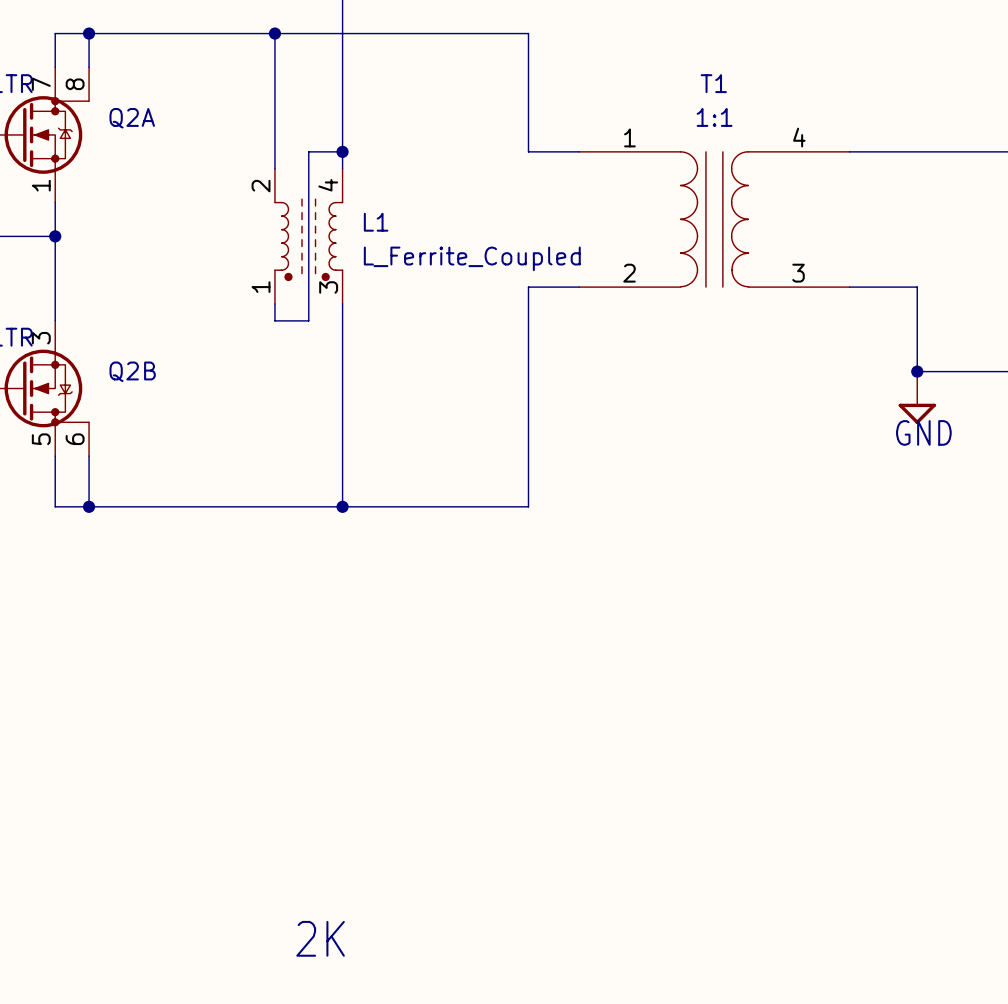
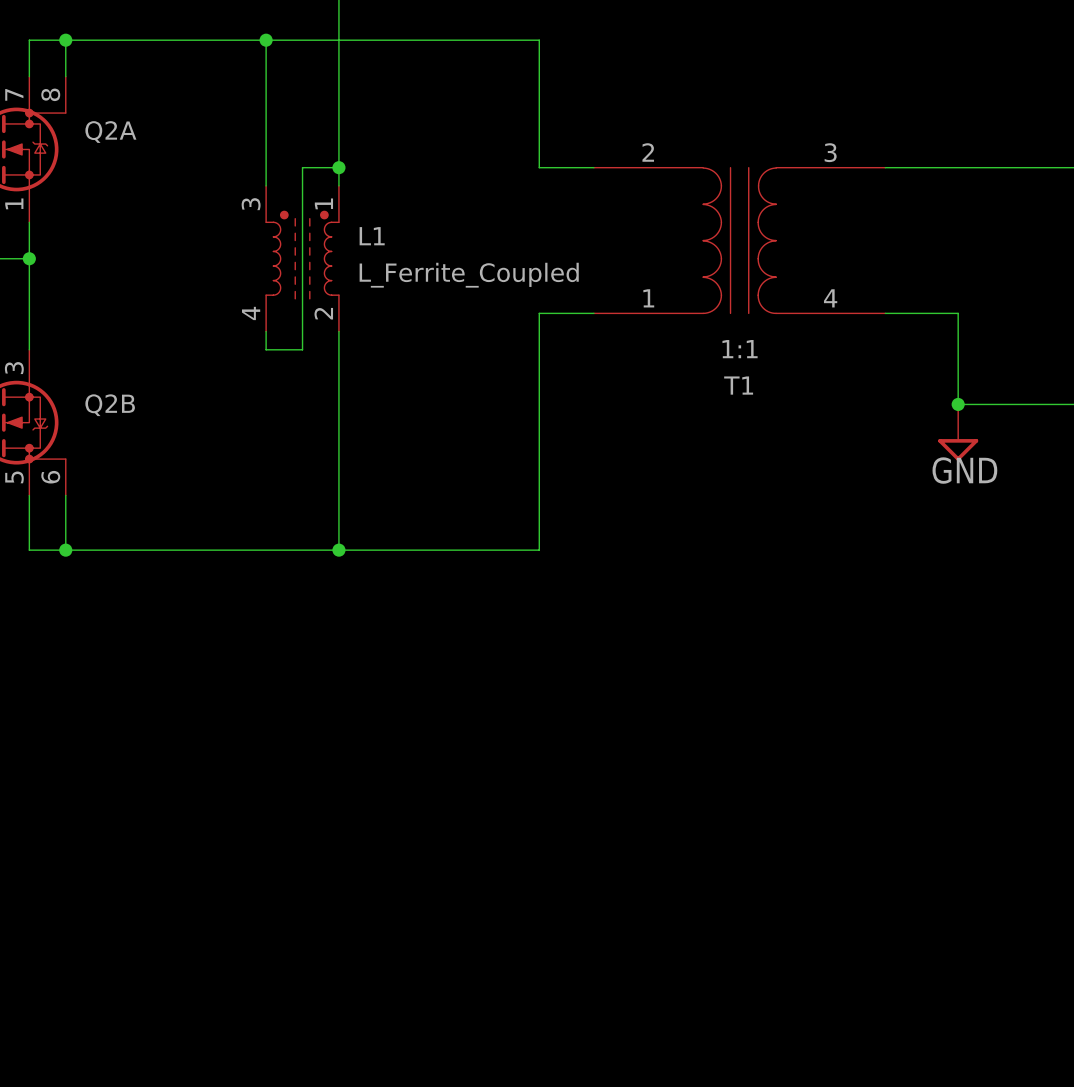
T1 flip: as is (714, 219) -> up-down (739, 240)
L1 rotation: 0° (308, 239) -> 180° (302, 255)
text: 2K (320, 938) -> none

